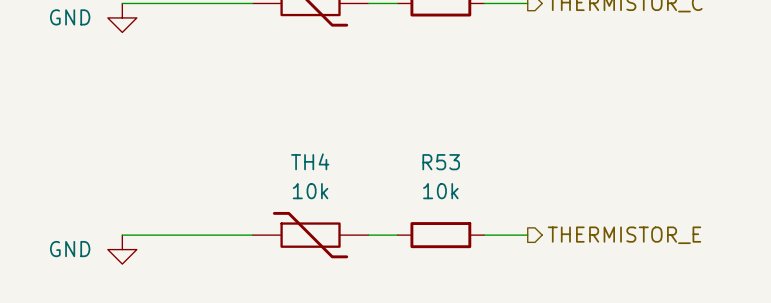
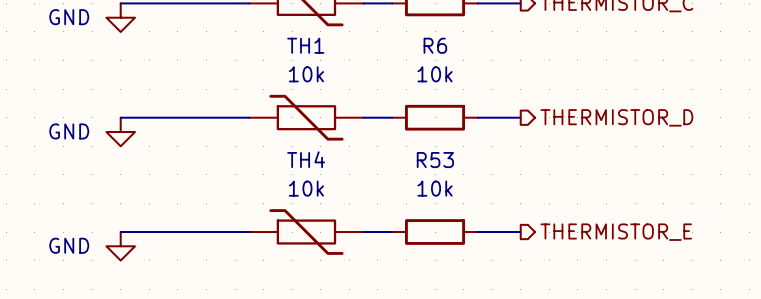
wire: none -> (120, 117) (249, 117)
TH1: none -> 10k (306, 117)
wire: none -> (363, 117) (392, 117)
R6: none -> 10k (435, 117)
wire: none -> (477, 117) (520, 117)
hierarchical label: none -> THERMISTOR_D (616, 117)
power symbol: none -> GND (120, 132)

